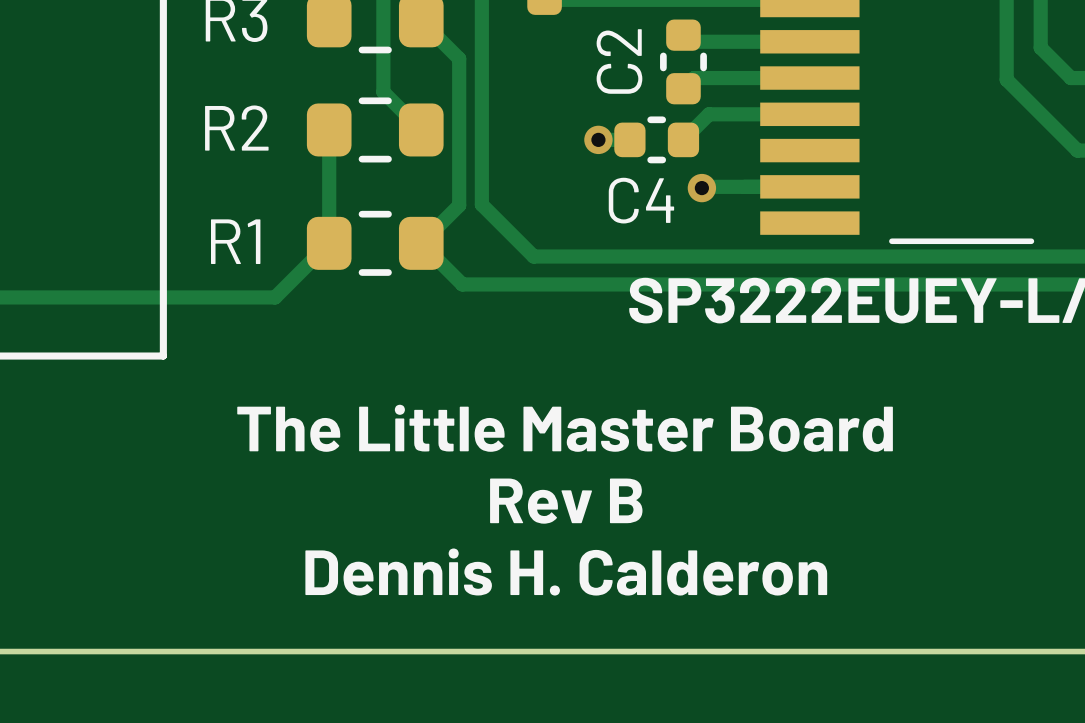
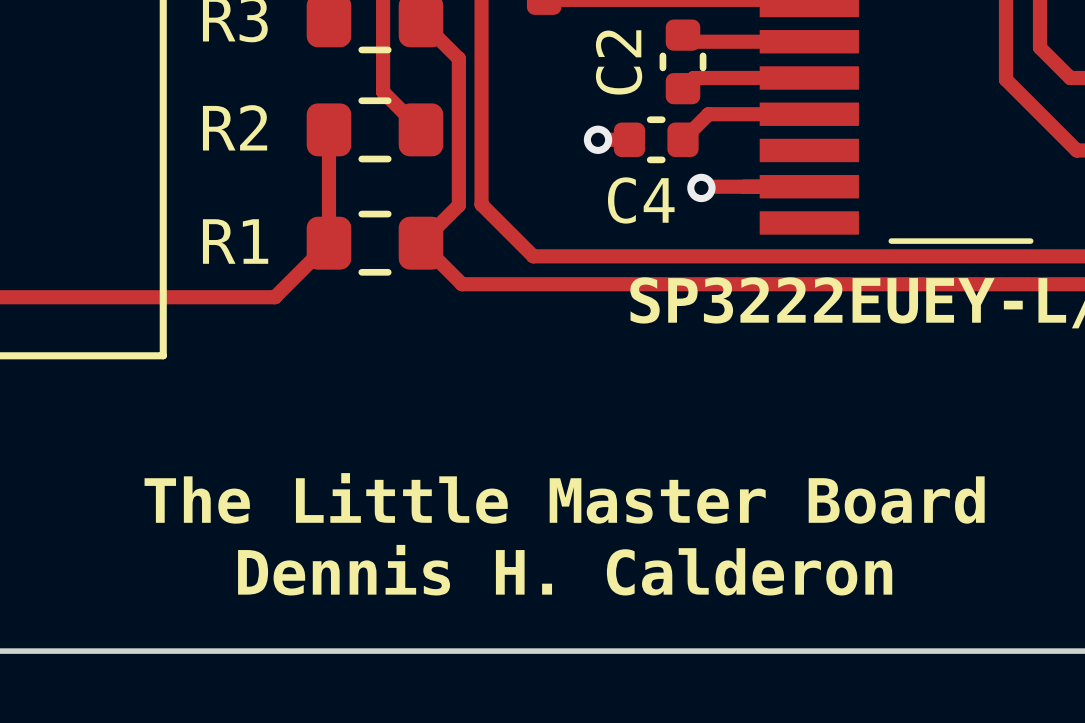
text: The Little Master Board (565, 428) -> none
text: Rev B (566, 501) -> The Little Master Board (564, 498)

